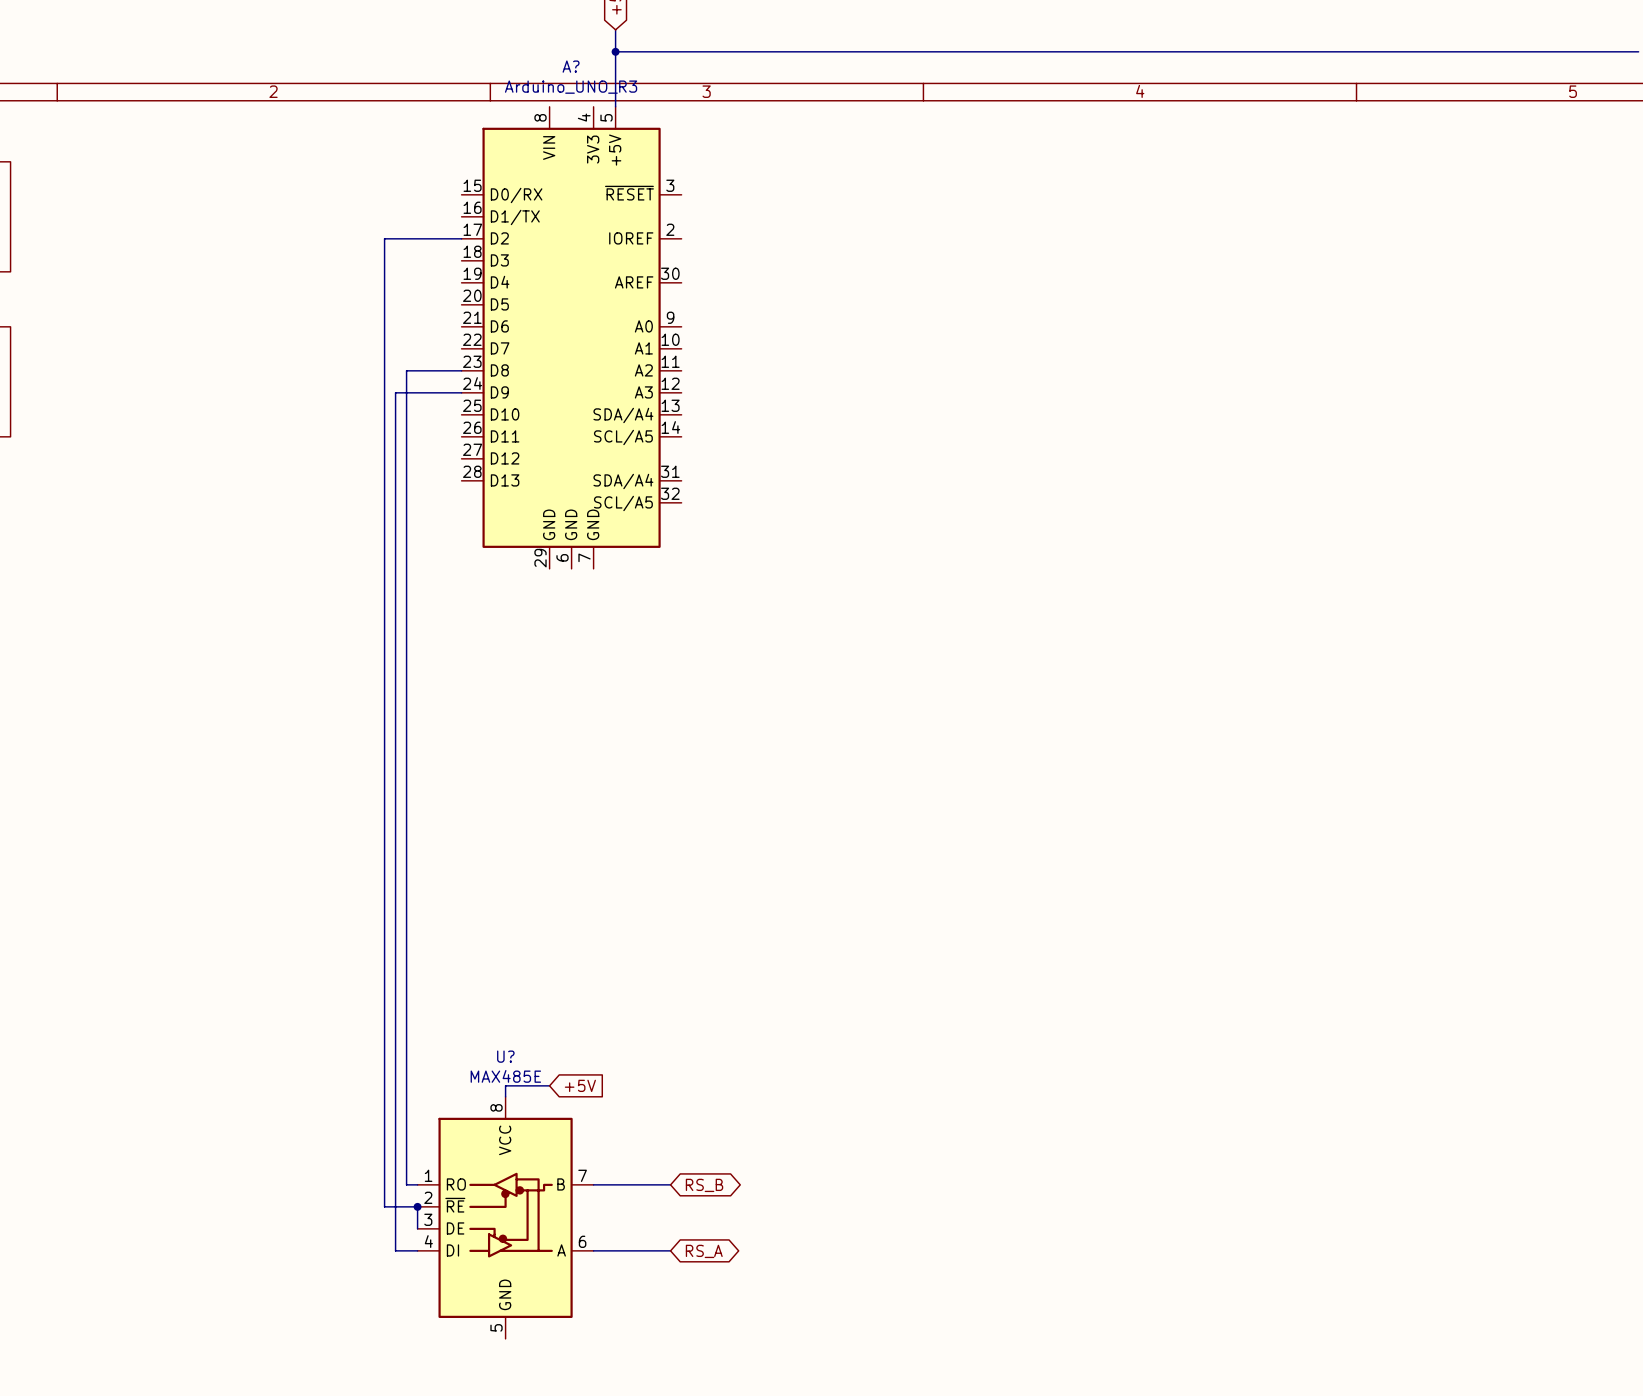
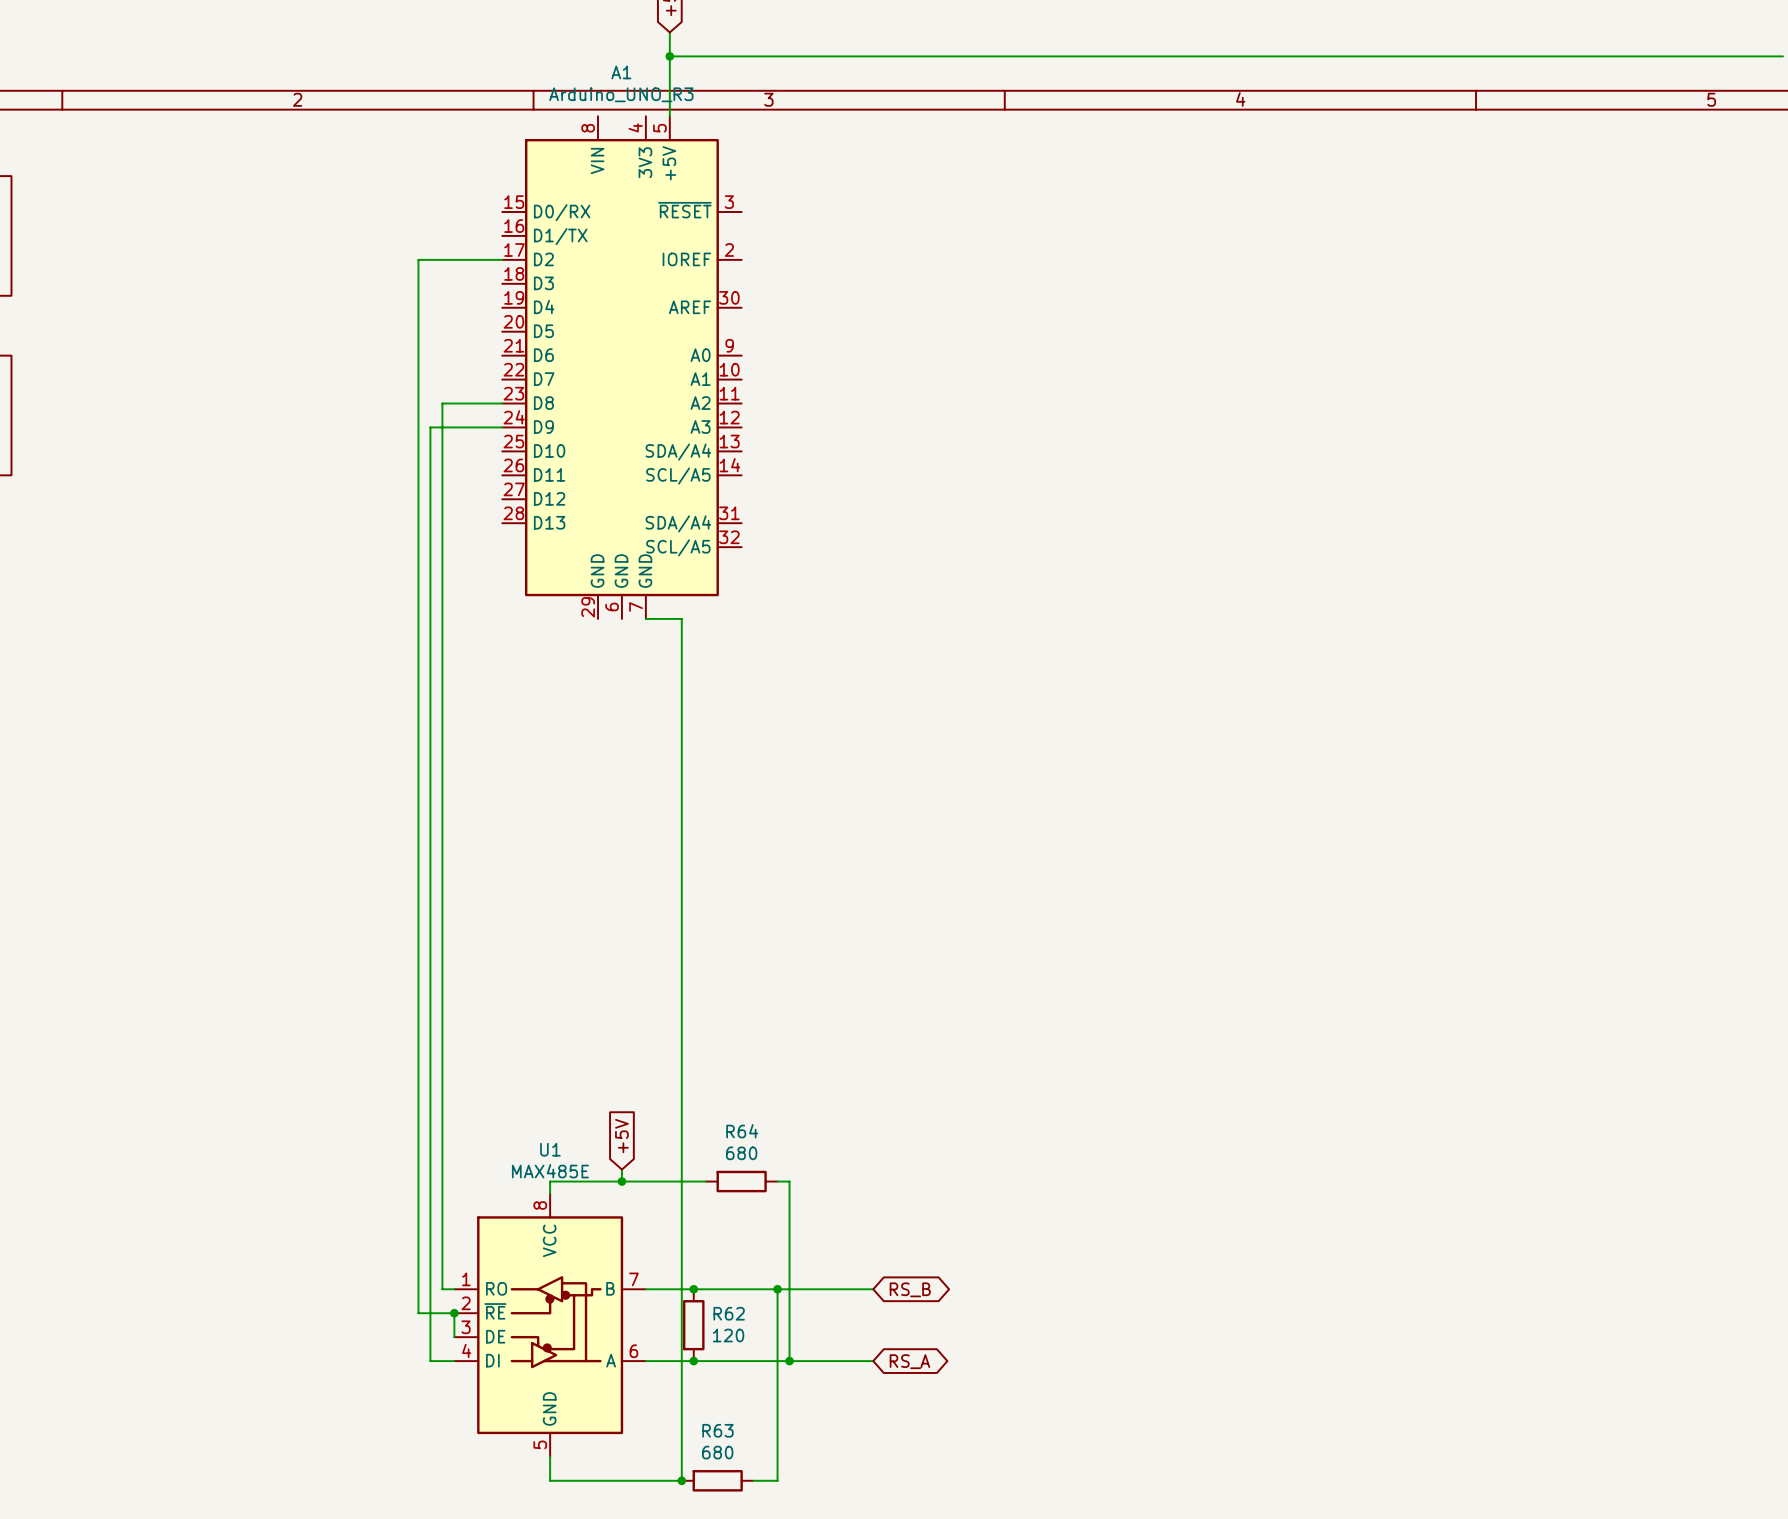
A? name: A? (571, 66) -> A1 (621, 72)
wire: none -> (645, 618) (681, 618) (681, 1480) (550, 1480) (550, 1456)
U? name: U? (505, 1056) -> U1 (550, 1149)
wire: none -> (621, 1169) (621, 1181)
wire: none -> (598, 1181) (705, 1181)
junction: none -> (621, 1181)
global label rotation: 0° (580, 1085) -> 90° counterclockwise (621, 1136)
R64: none -> 680 (741, 1181)
wire: none -> (777, 1181) (789, 1181) (789, 1361)
junction: none -> (693, 1289)
wire: none -> (729, 1289) (873, 1289)
wire: none -> (777, 1289) (777, 1480) (753, 1480)
junction: none -> (777, 1289)
global label position: RS_B (704, 1185) -> RS_B (910, 1289)
R62: none -> 120 (693, 1325)
junction: none -> (693, 1361)
wire: none -> (729, 1361) (873, 1361)
junction: none -> (789, 1361)
global label position: RS_A (704, 1251) -> RS_A (909, 1361)
junction: none -> (681, 1480)
R63: none -> 680 (717, 1480)

